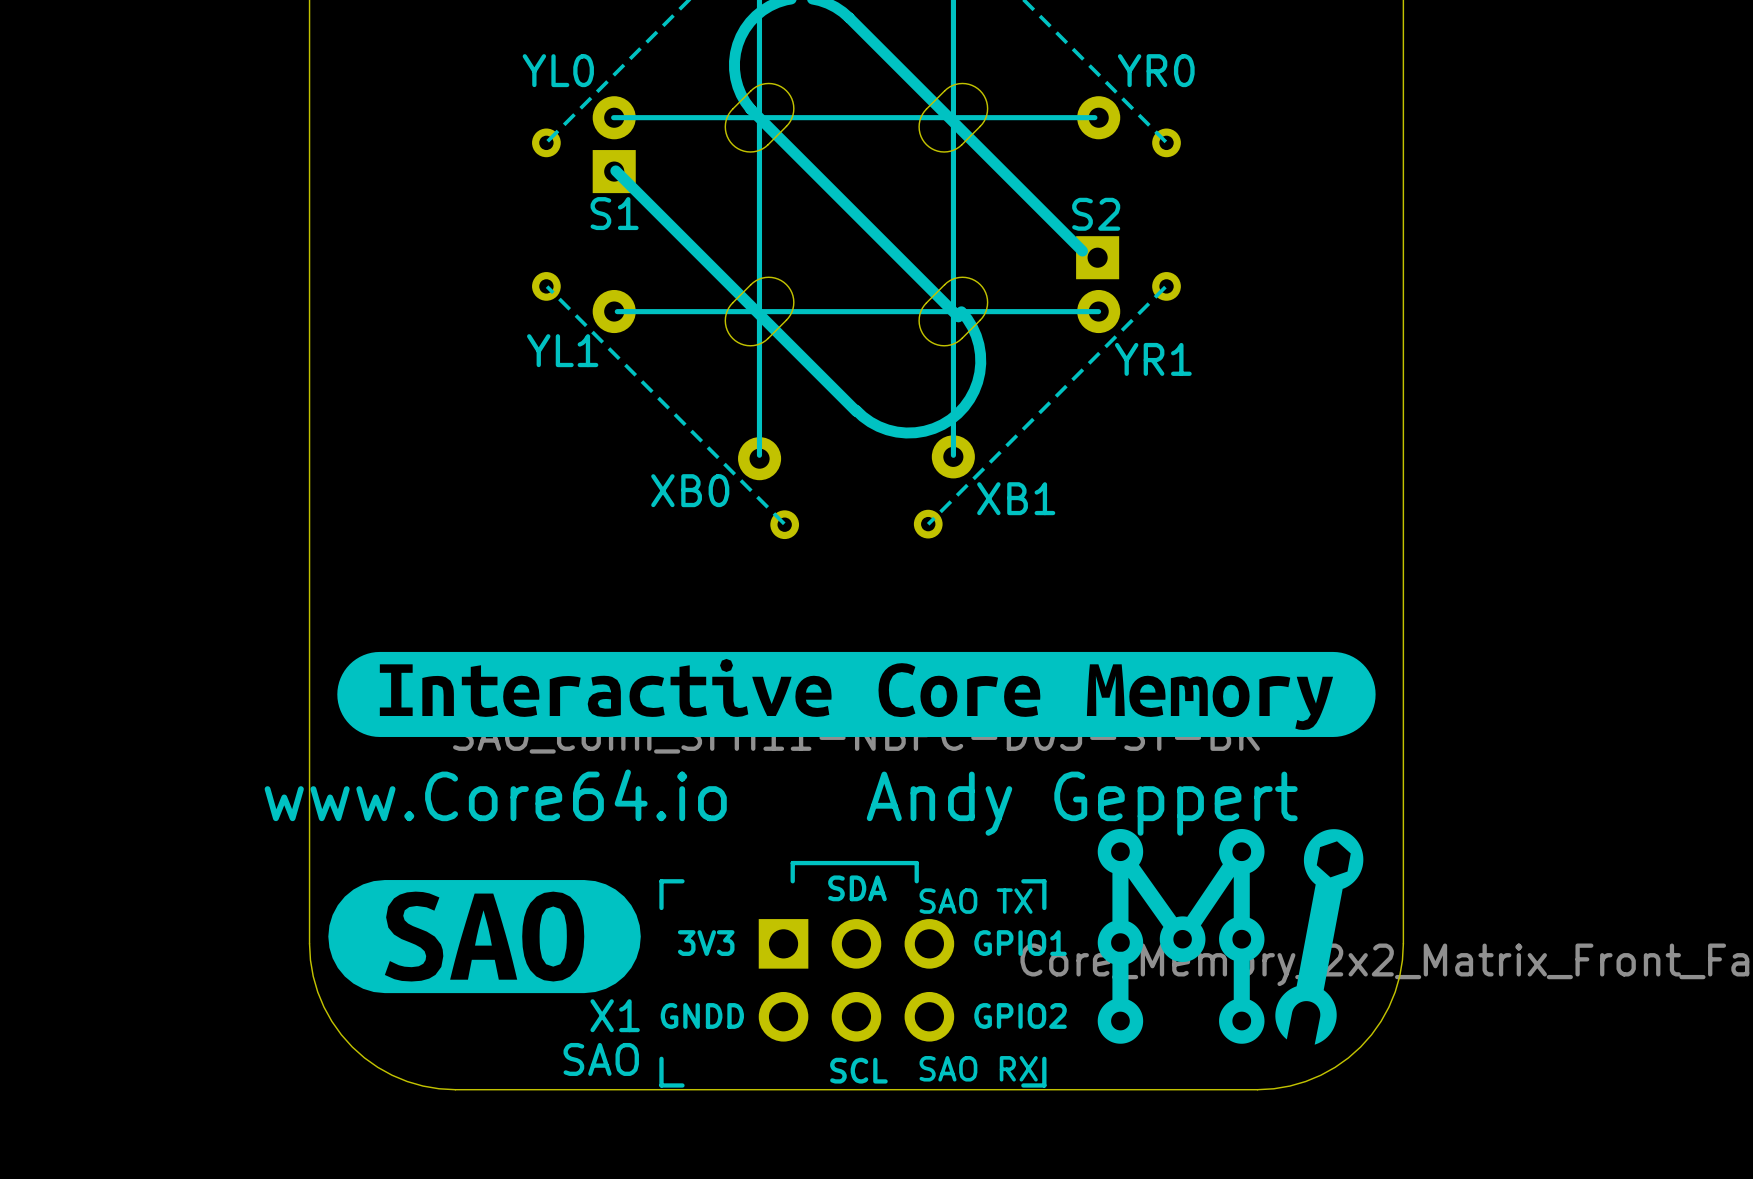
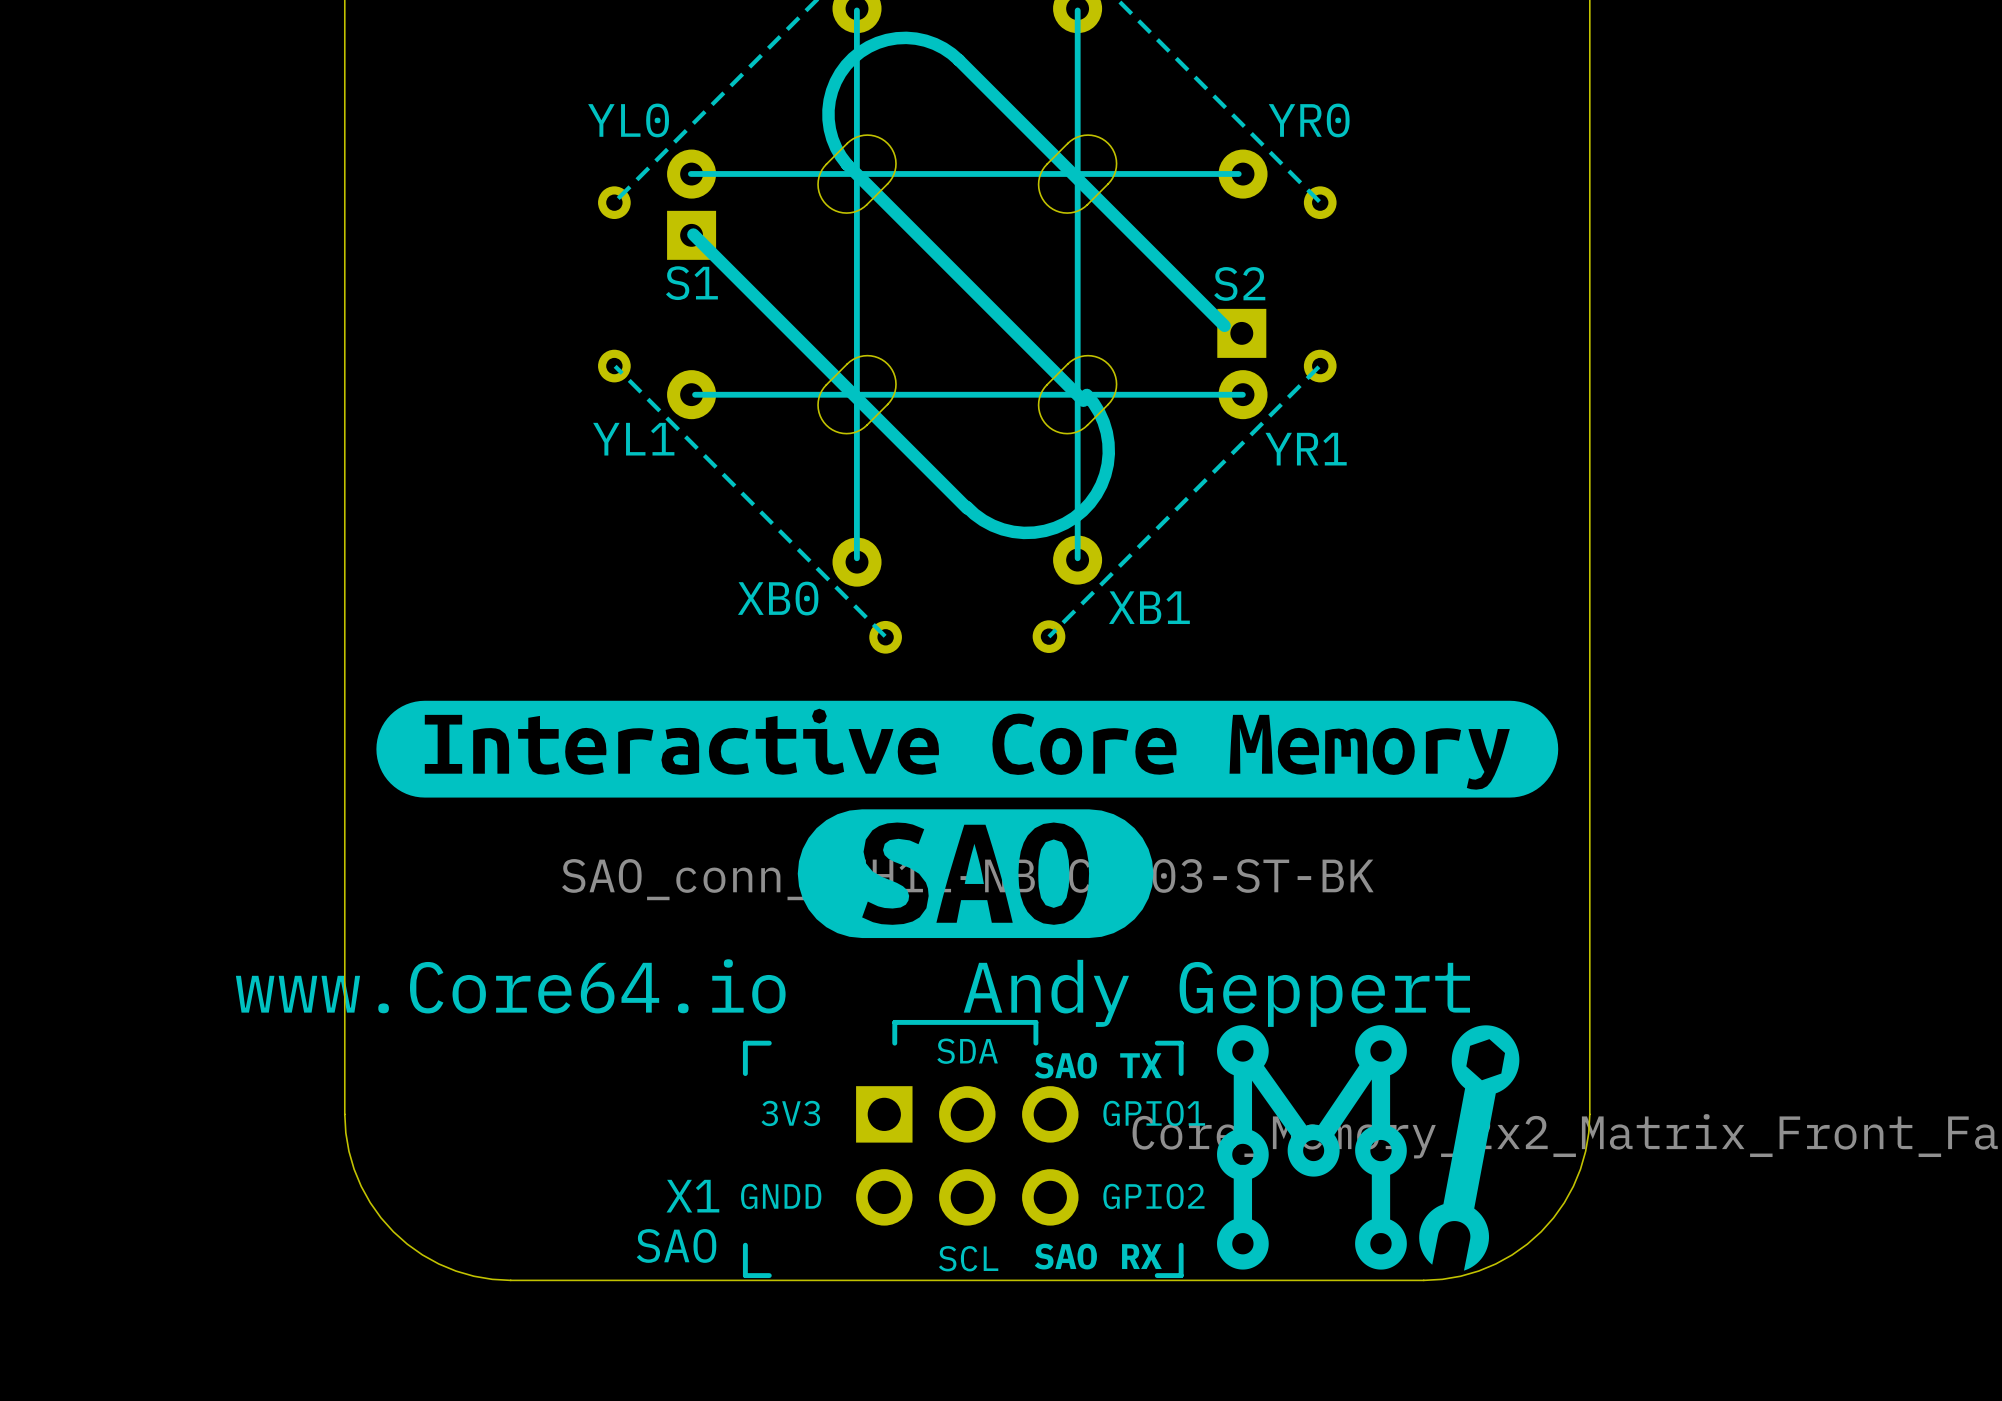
drawing position: (856, 694) -> (967, 749)
text position: www.Core64.io Andy Geppert (781, 802) -> www.Core64.io Andy Geppert (852, 993)
drawing position: (484, 936) -> (975, 873)
drawing position: (1230, 936) -> (1368, 1147)

